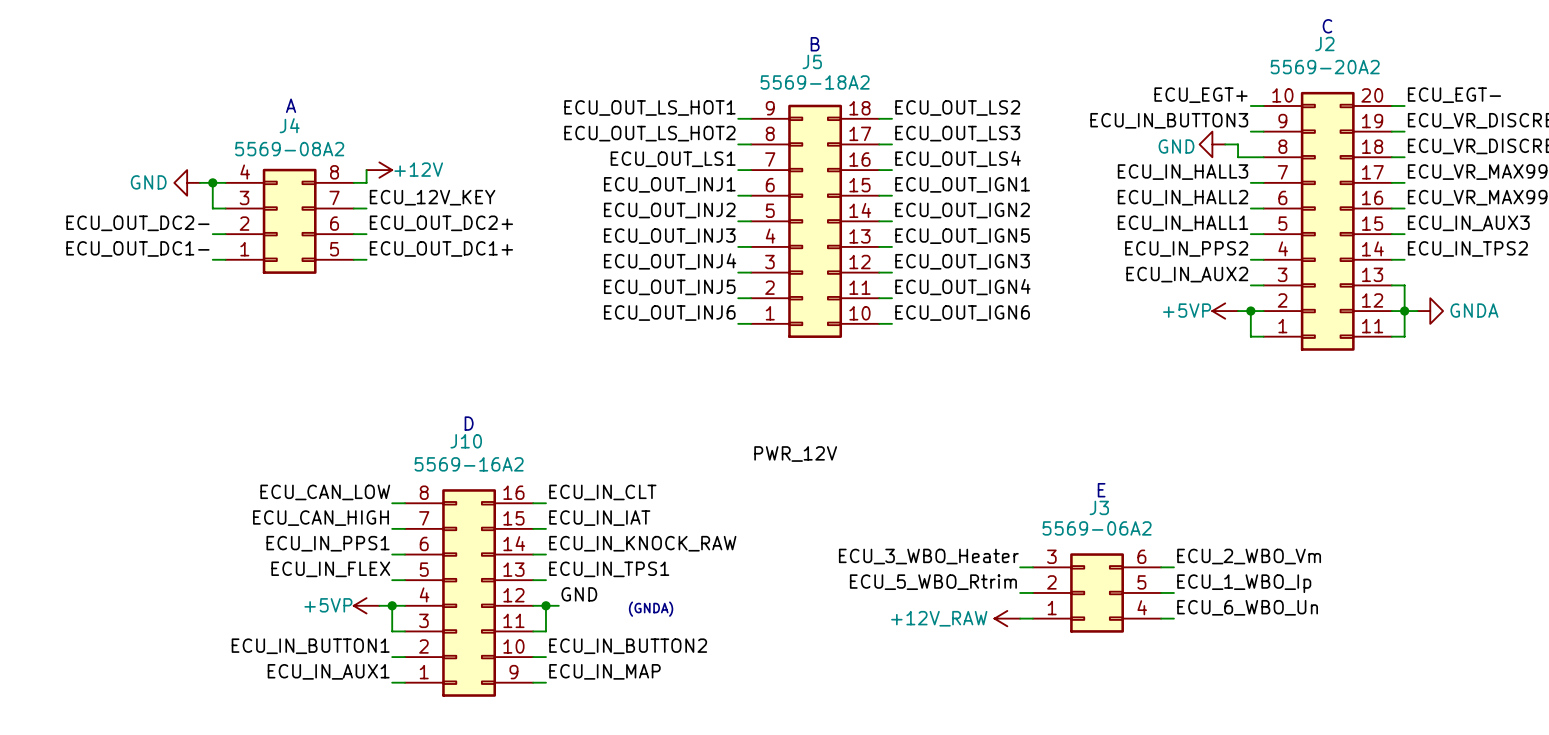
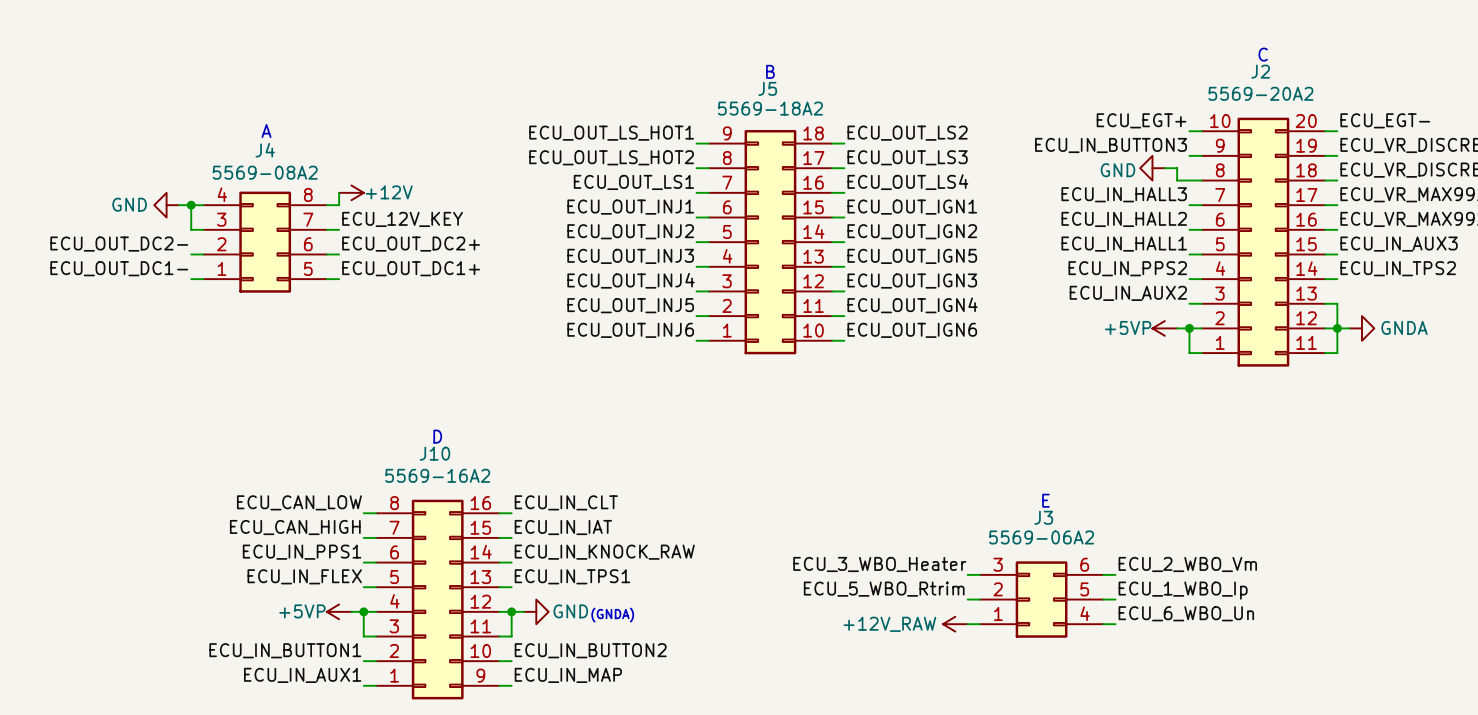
label: PWR_12V (795, 454) -> none
label: GND (579, 594) -> none
power symbol: none -> GND (536, 611)

